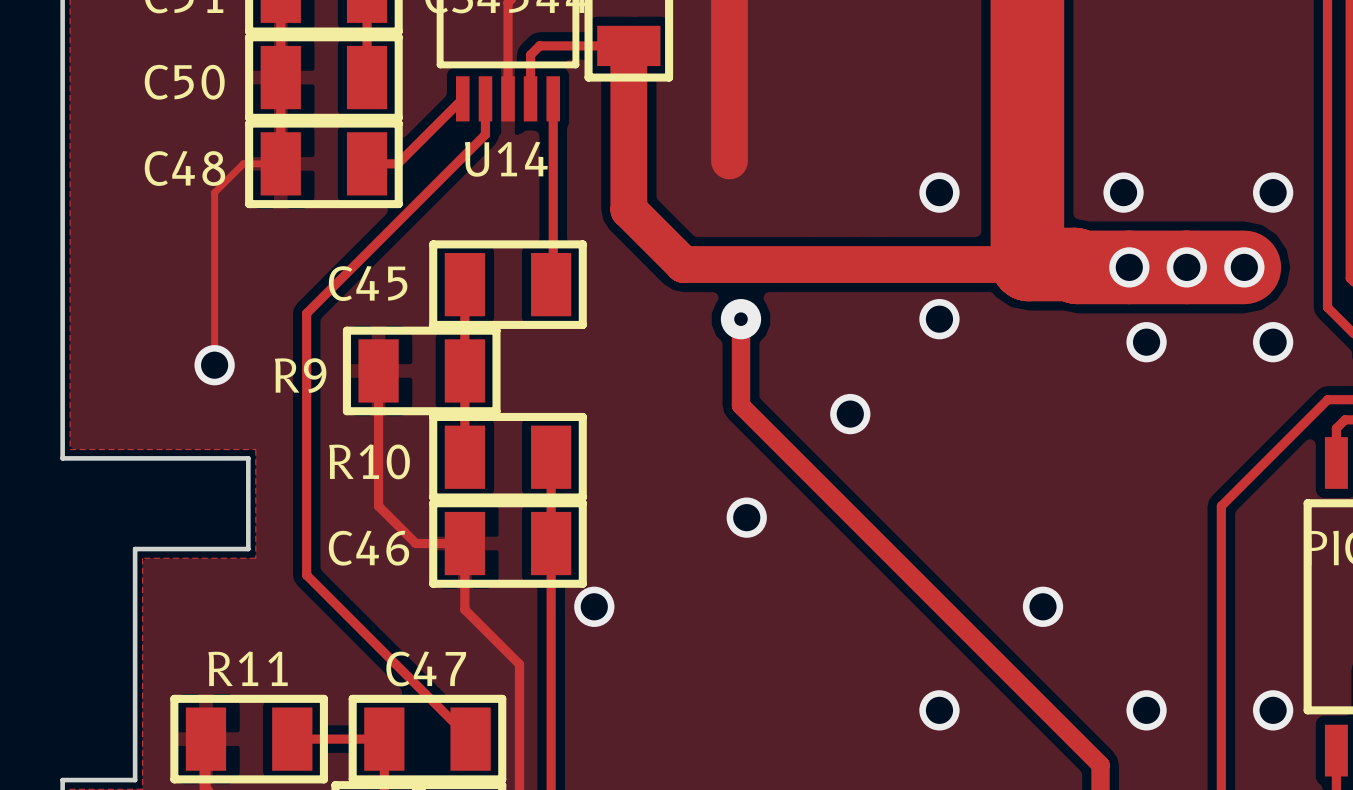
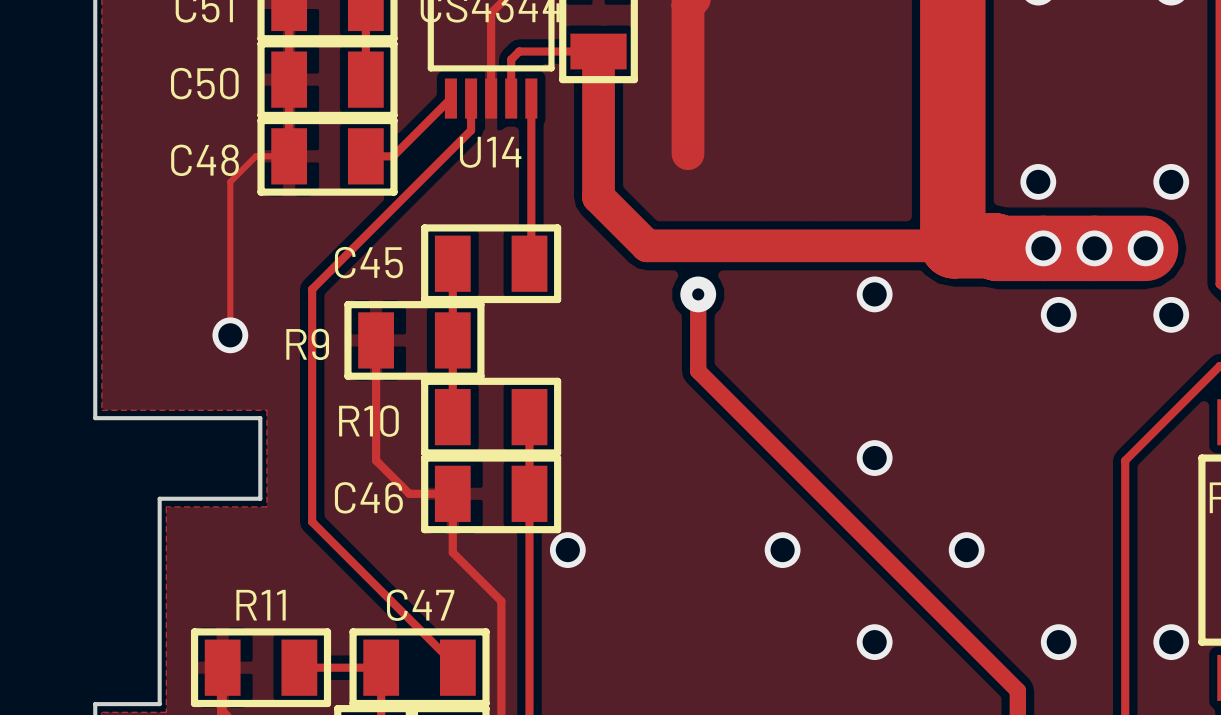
via: (939, 192) -> none
via: (850, 414) -> none
via: none -> (874, 458)
via: (746, 517) -> none
via: none -> (782, 550)

